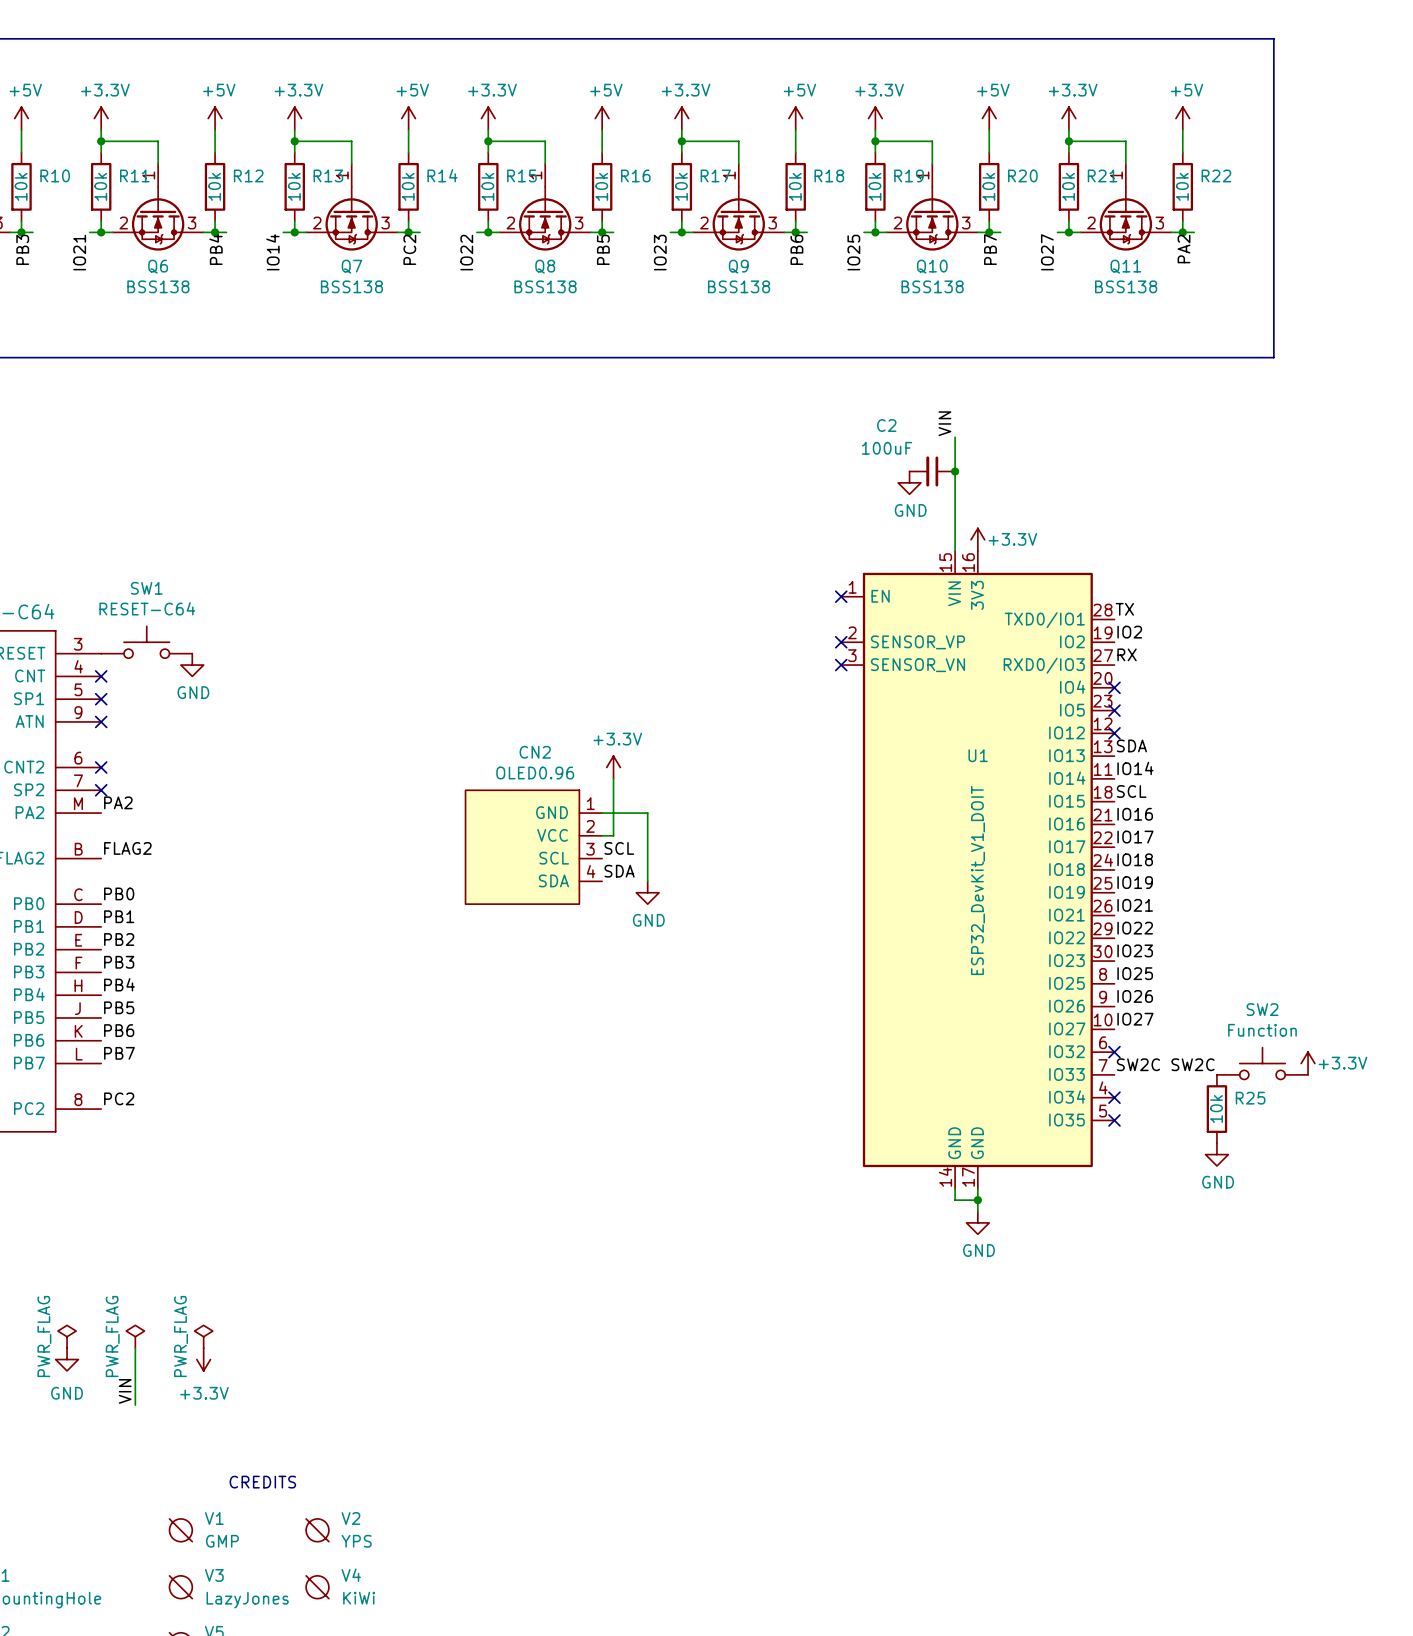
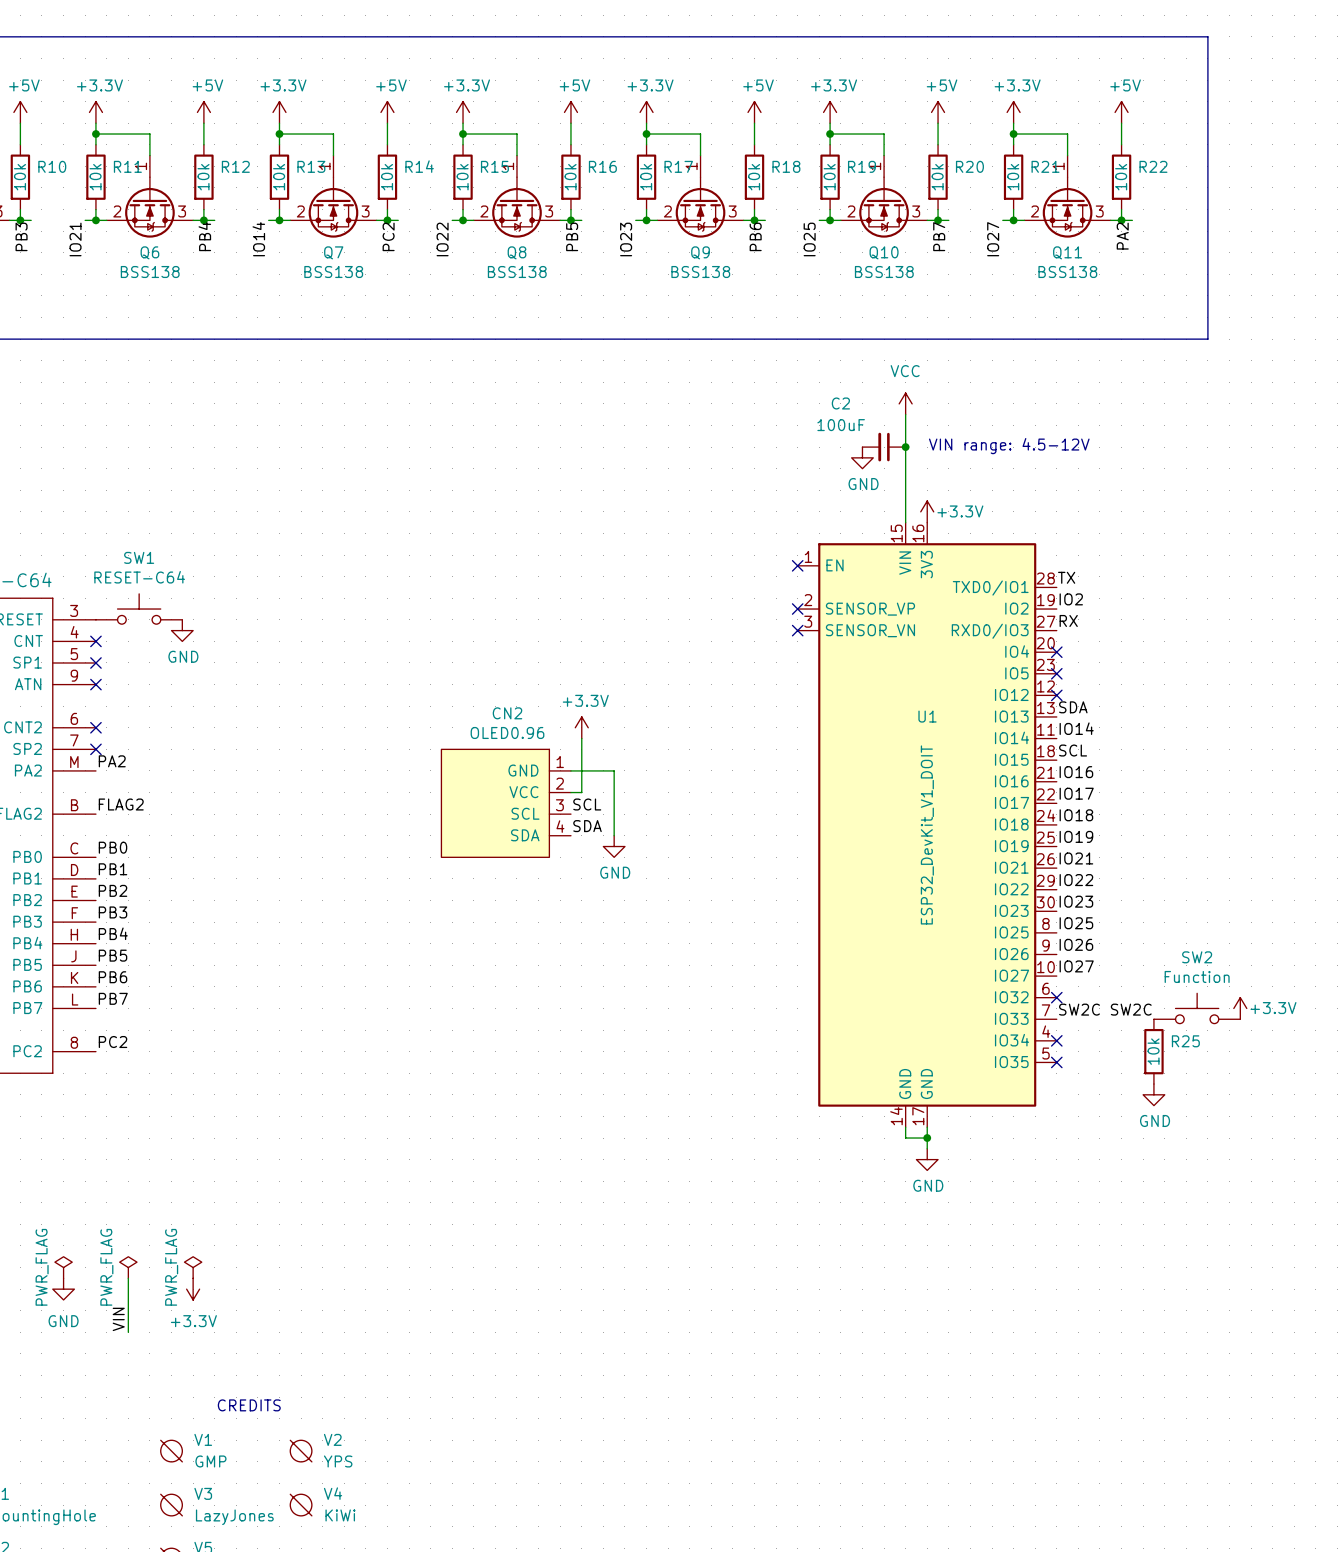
label: VIN (944, 423) -> none
power symbol: none -> VCC (905, 403)
text: none -> VIN range: 4.5-12V (1009, 446)

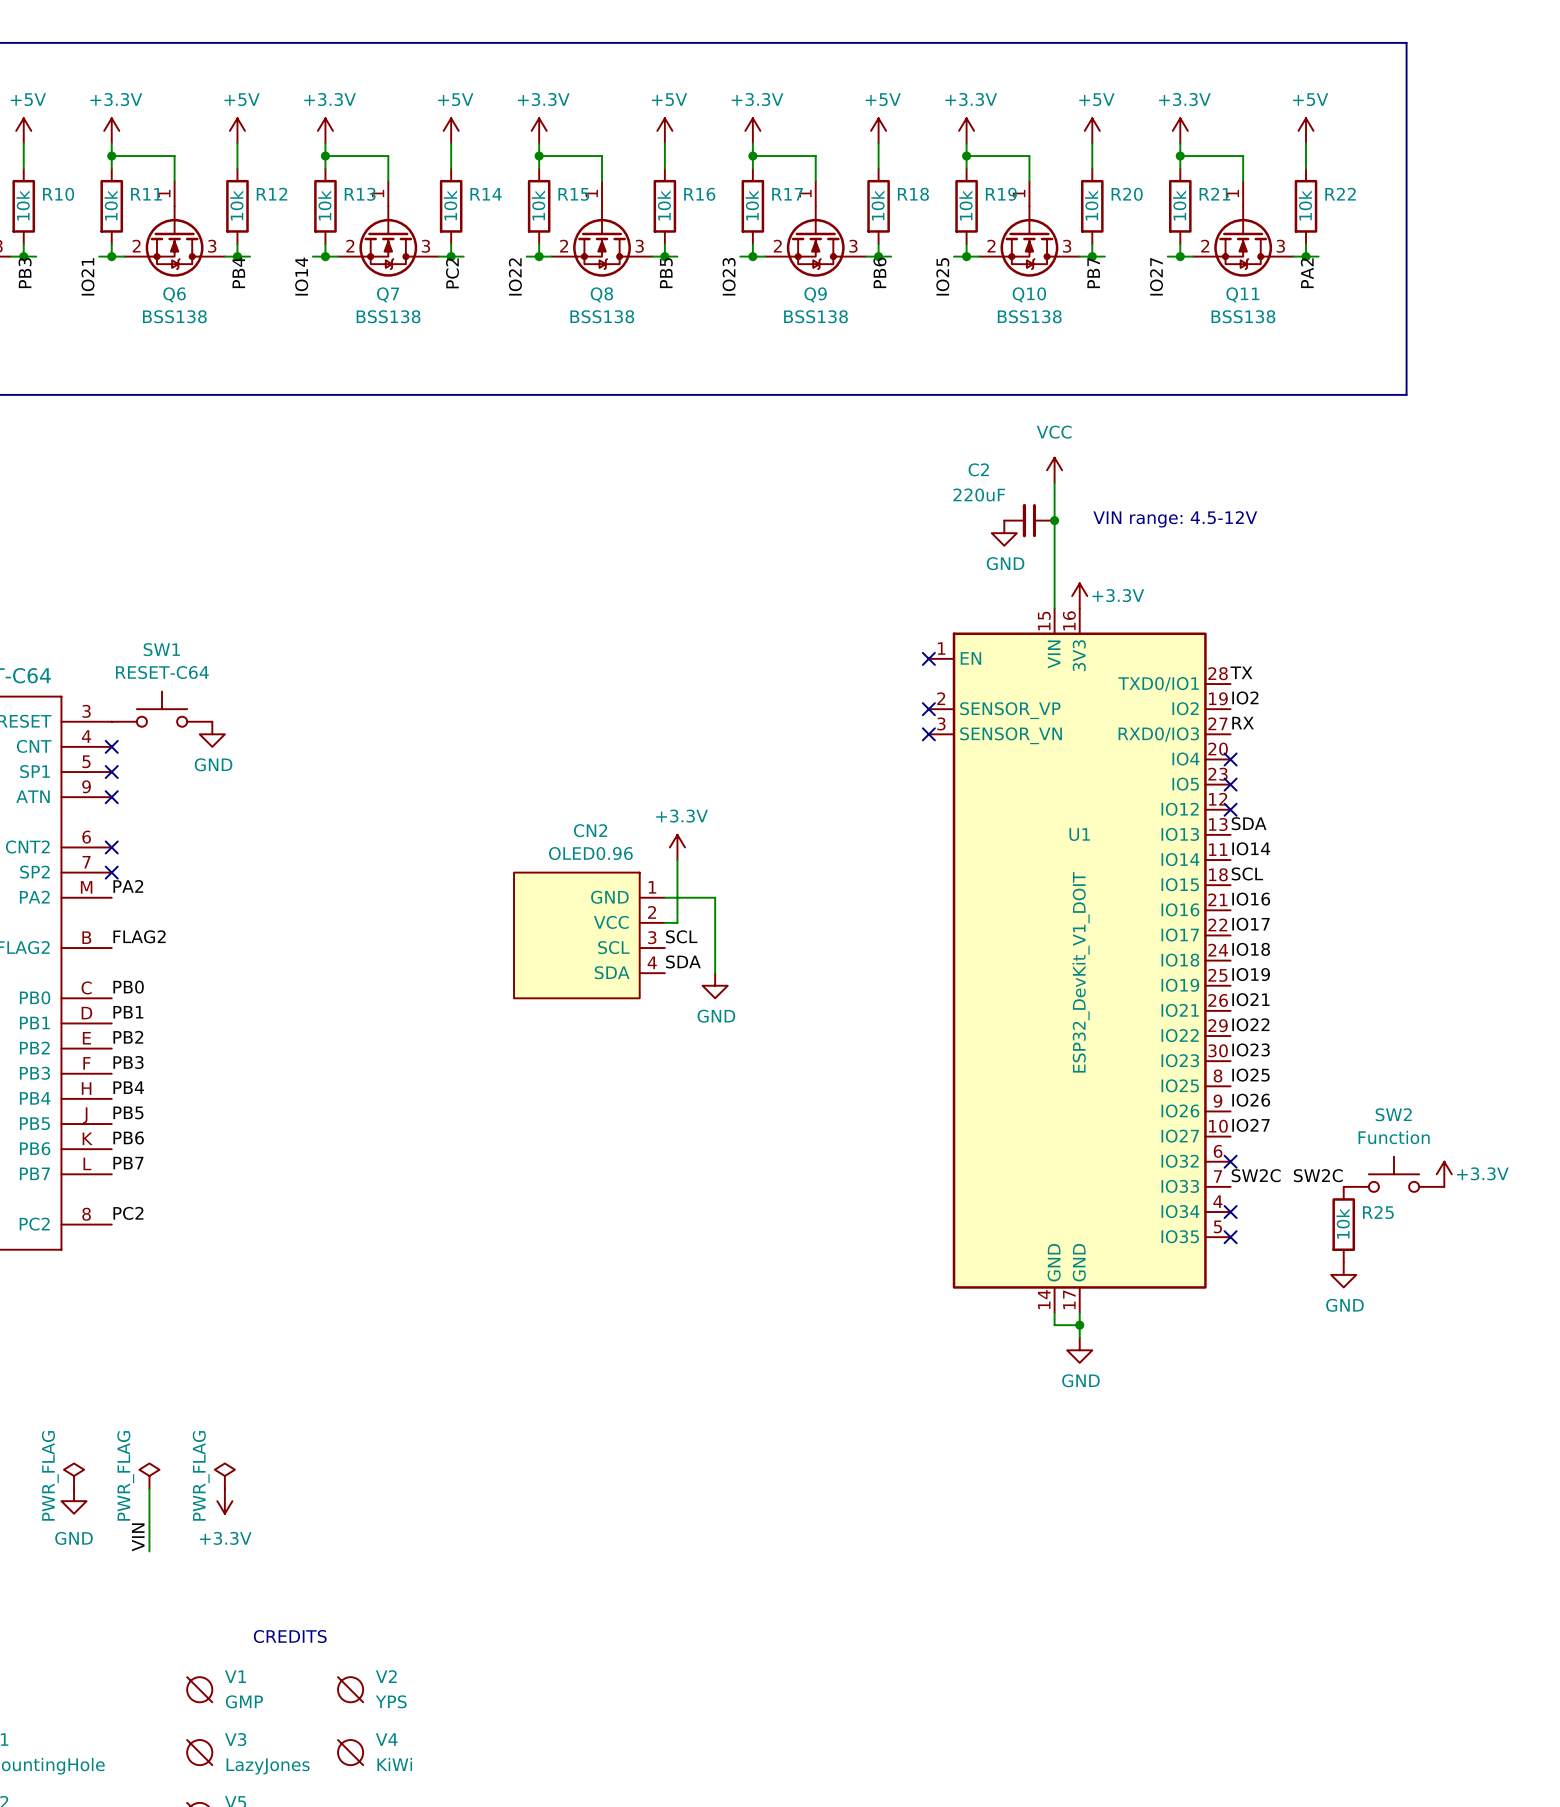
C2 value: 100uF (841, 425) -> 220uF (979, 495)

